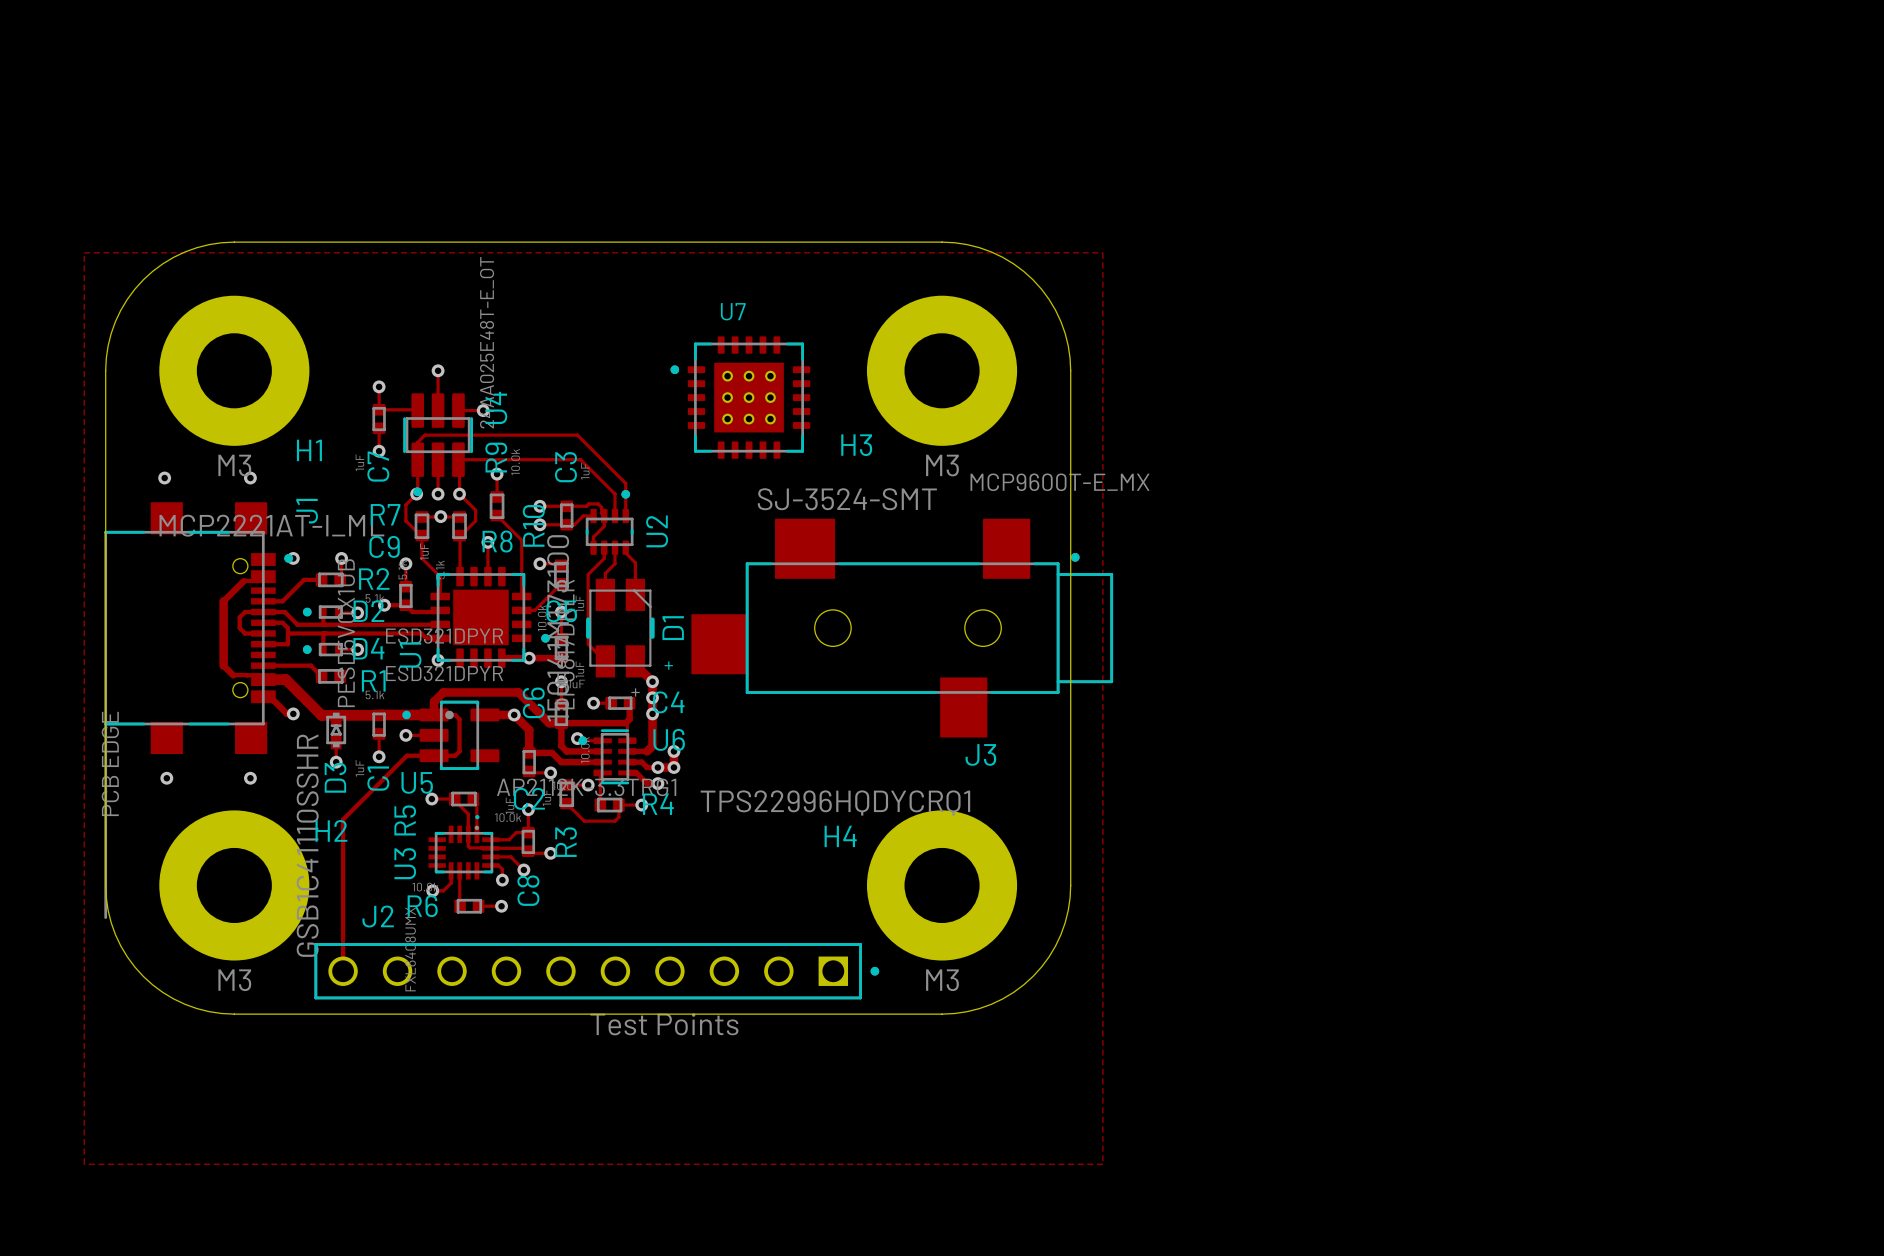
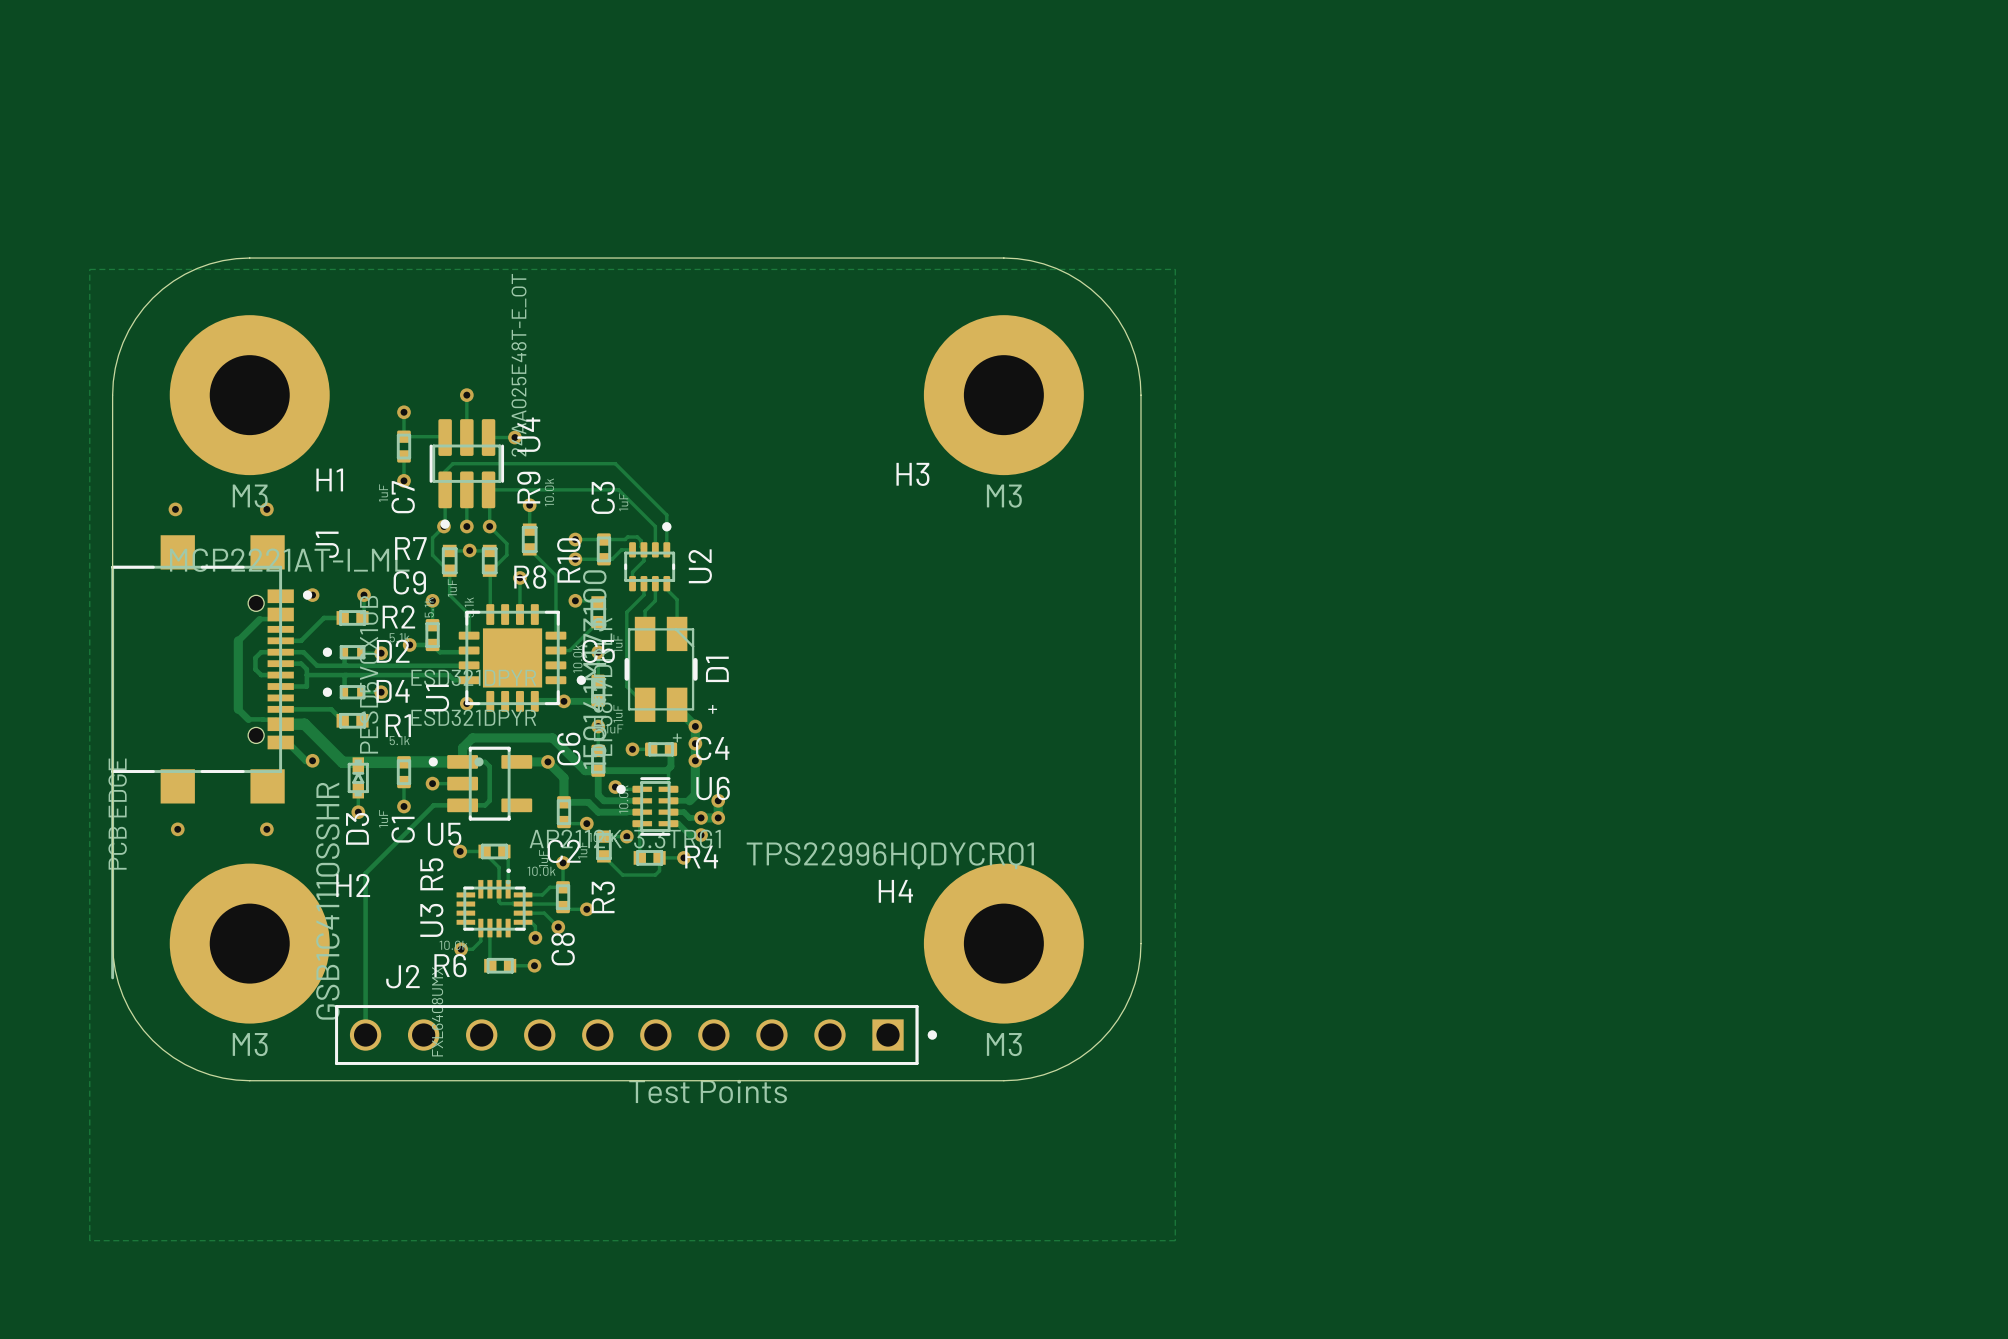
U7: MCP9600T-E_MX (740, 397) -> none
J3: SJ-3524-SMT (902, 628) -> none

